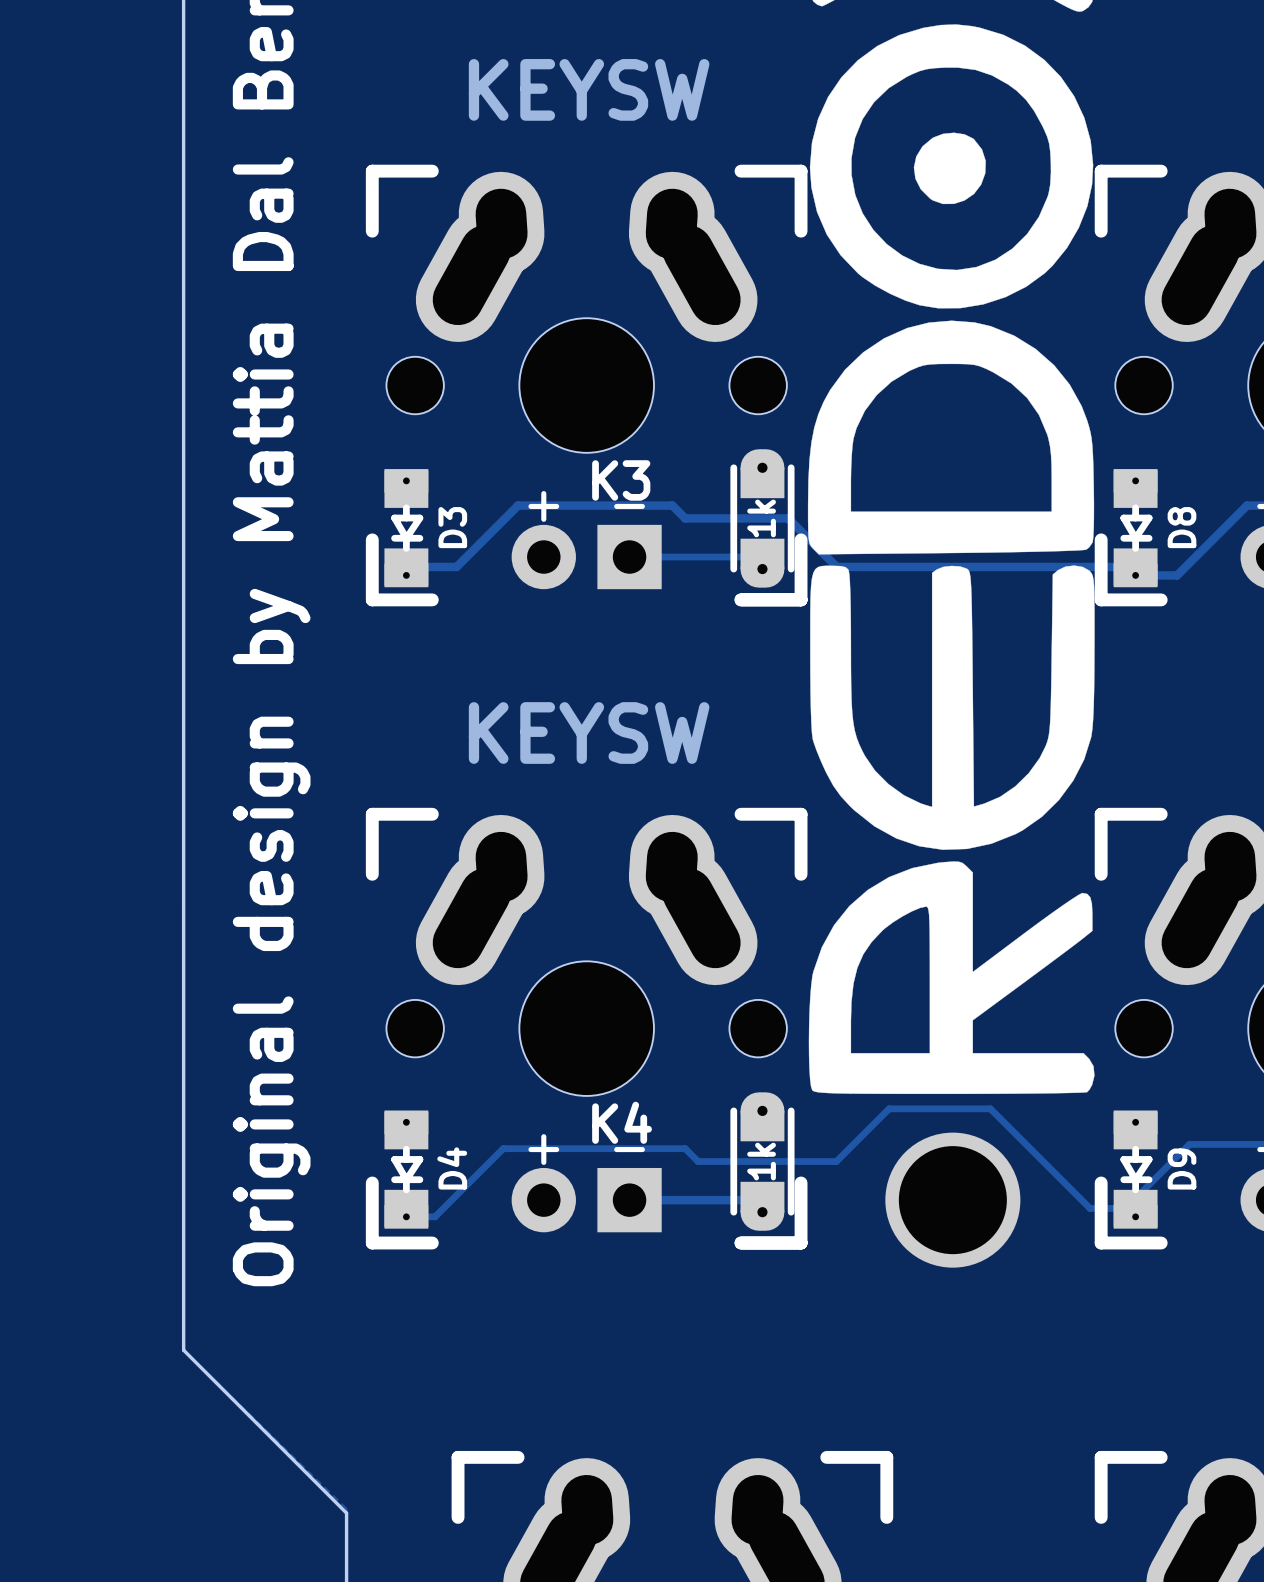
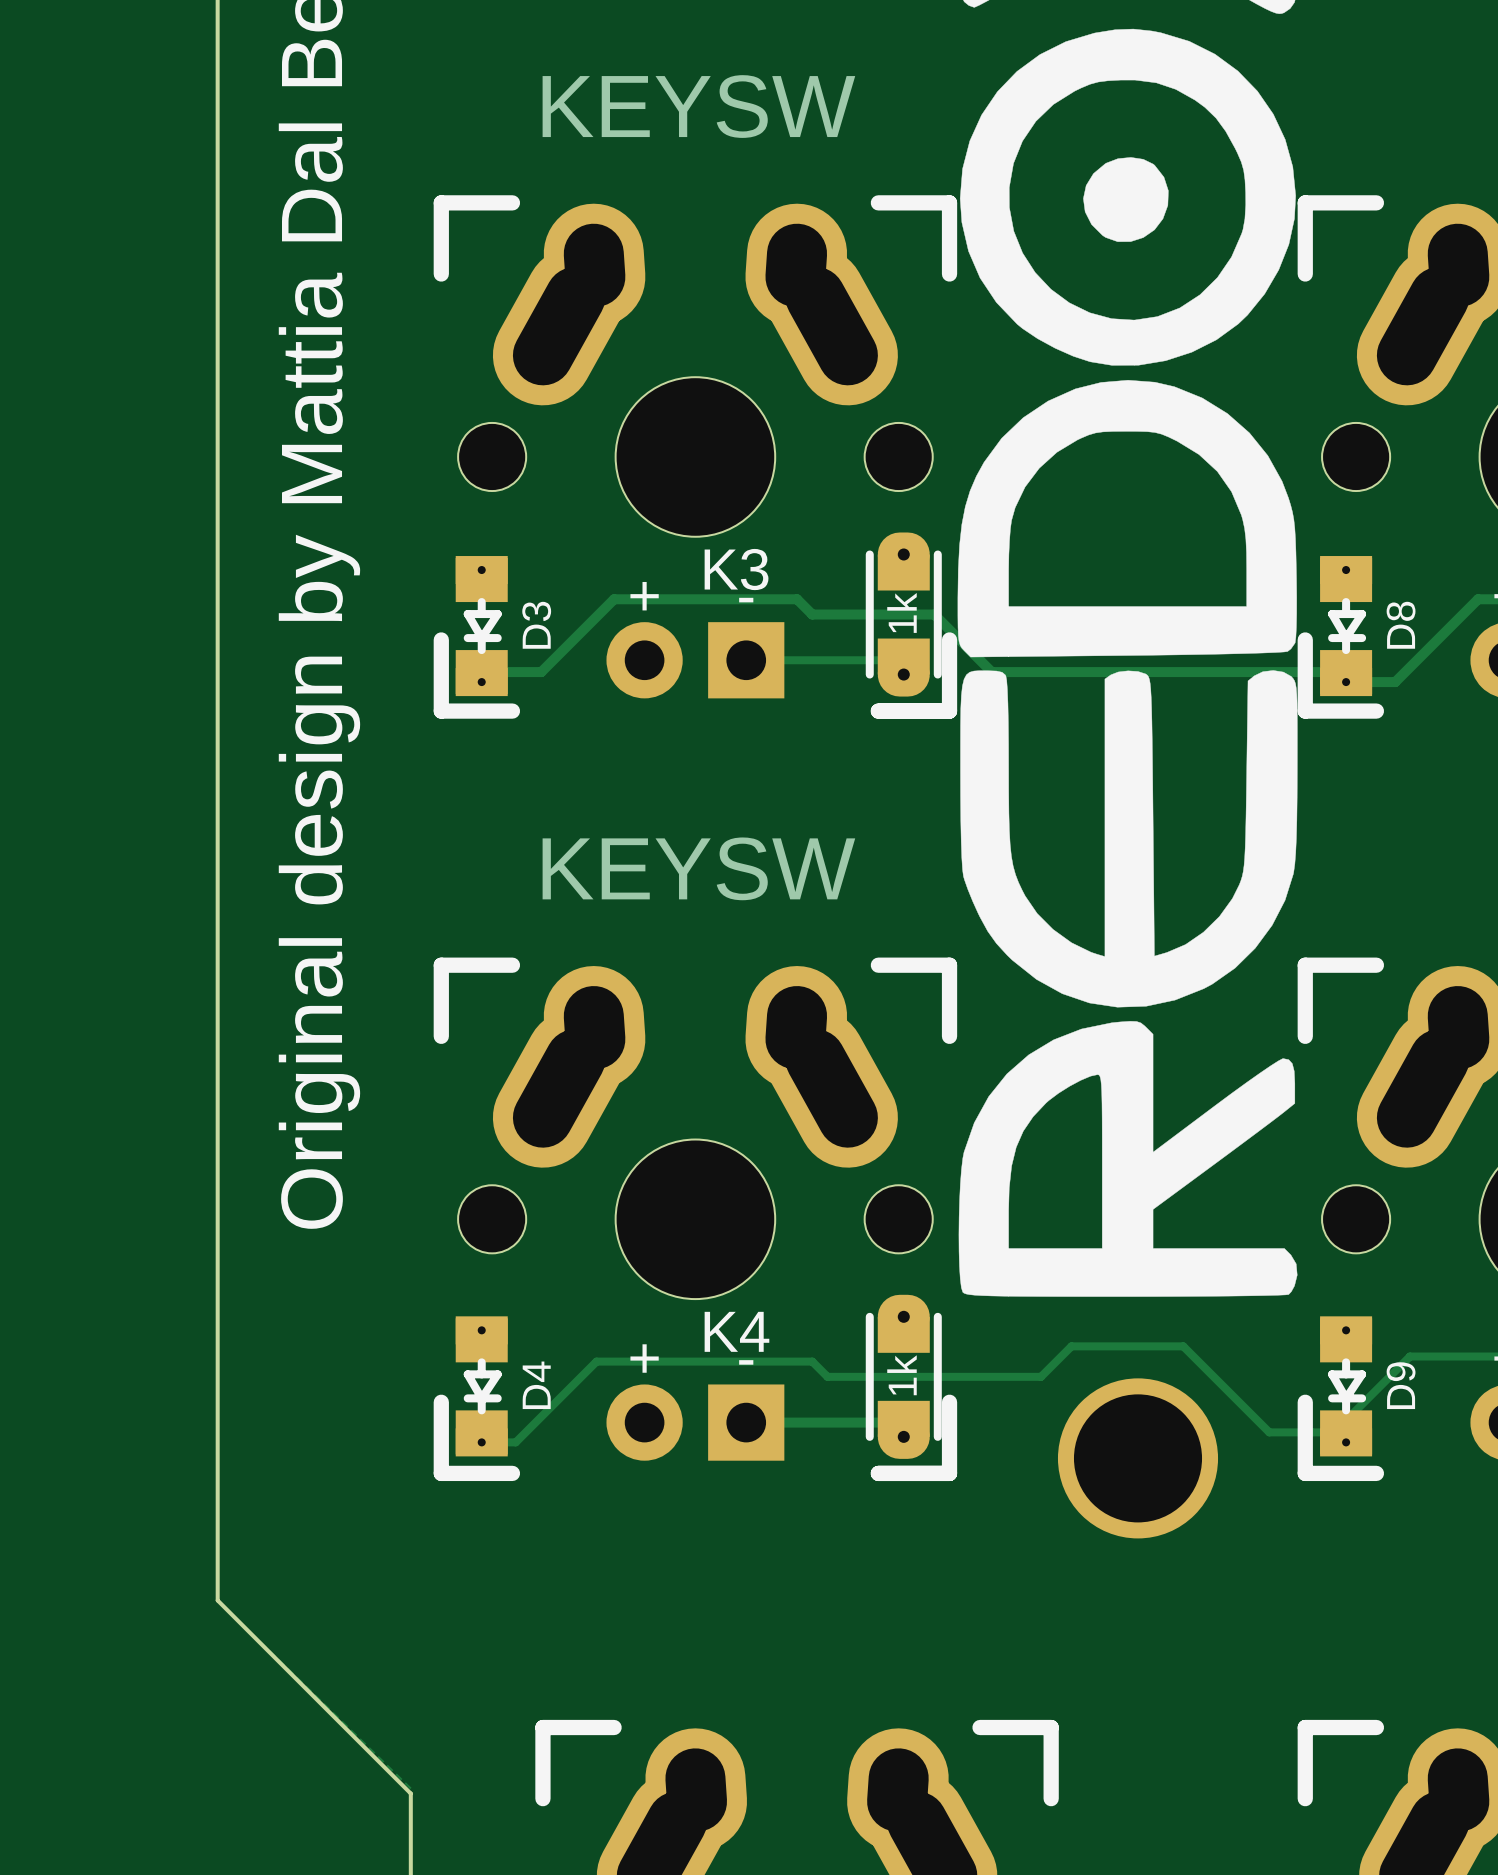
track: (836, 1161) (889, 1108) (990, 1108) (1090, 1208) -> (991, 1376) (1041, 1376) (1071, 1346) (1183, 1346) (1269, 1432) (1292, 1432)
part position: (952, 1200) -> (1138, 1458)

